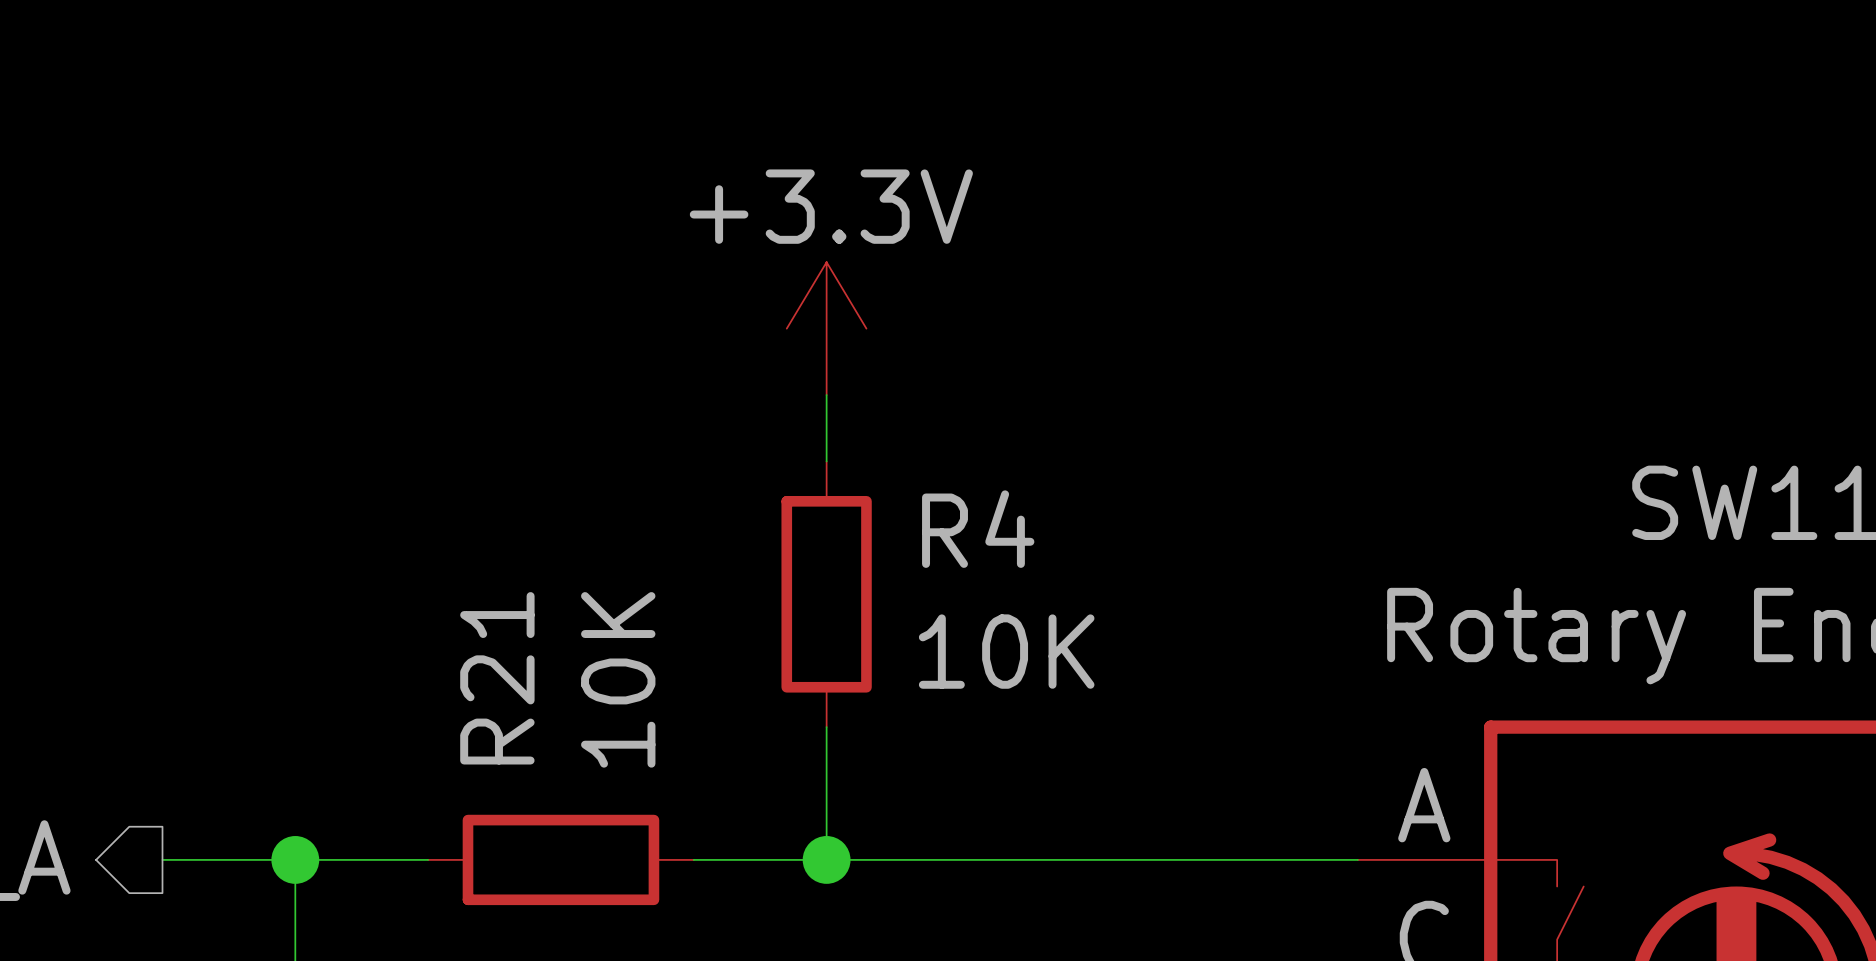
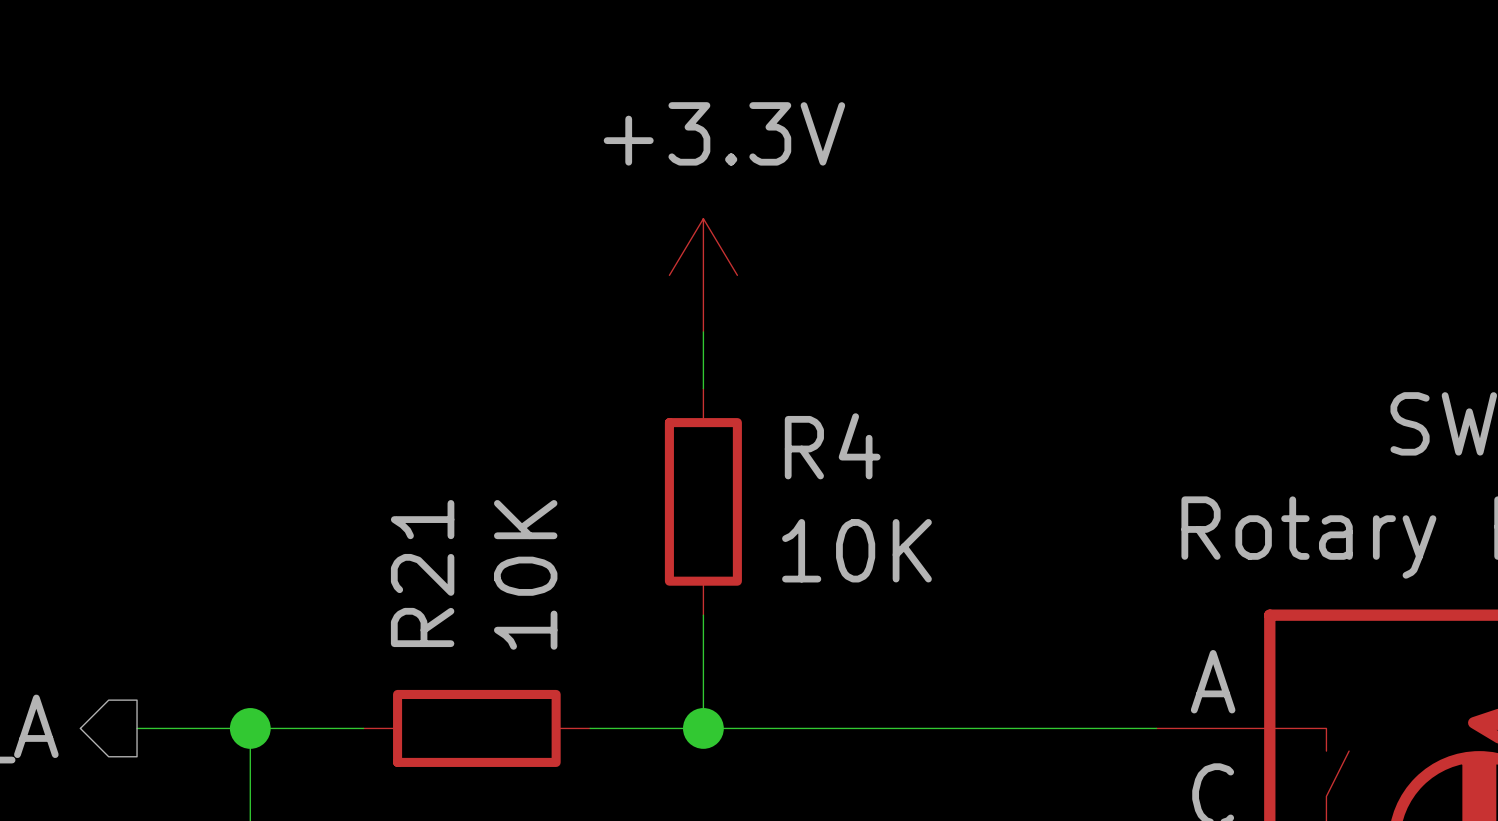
power symbol text position: +3.3V (831, 206) -> +3.3V (724, 133)

